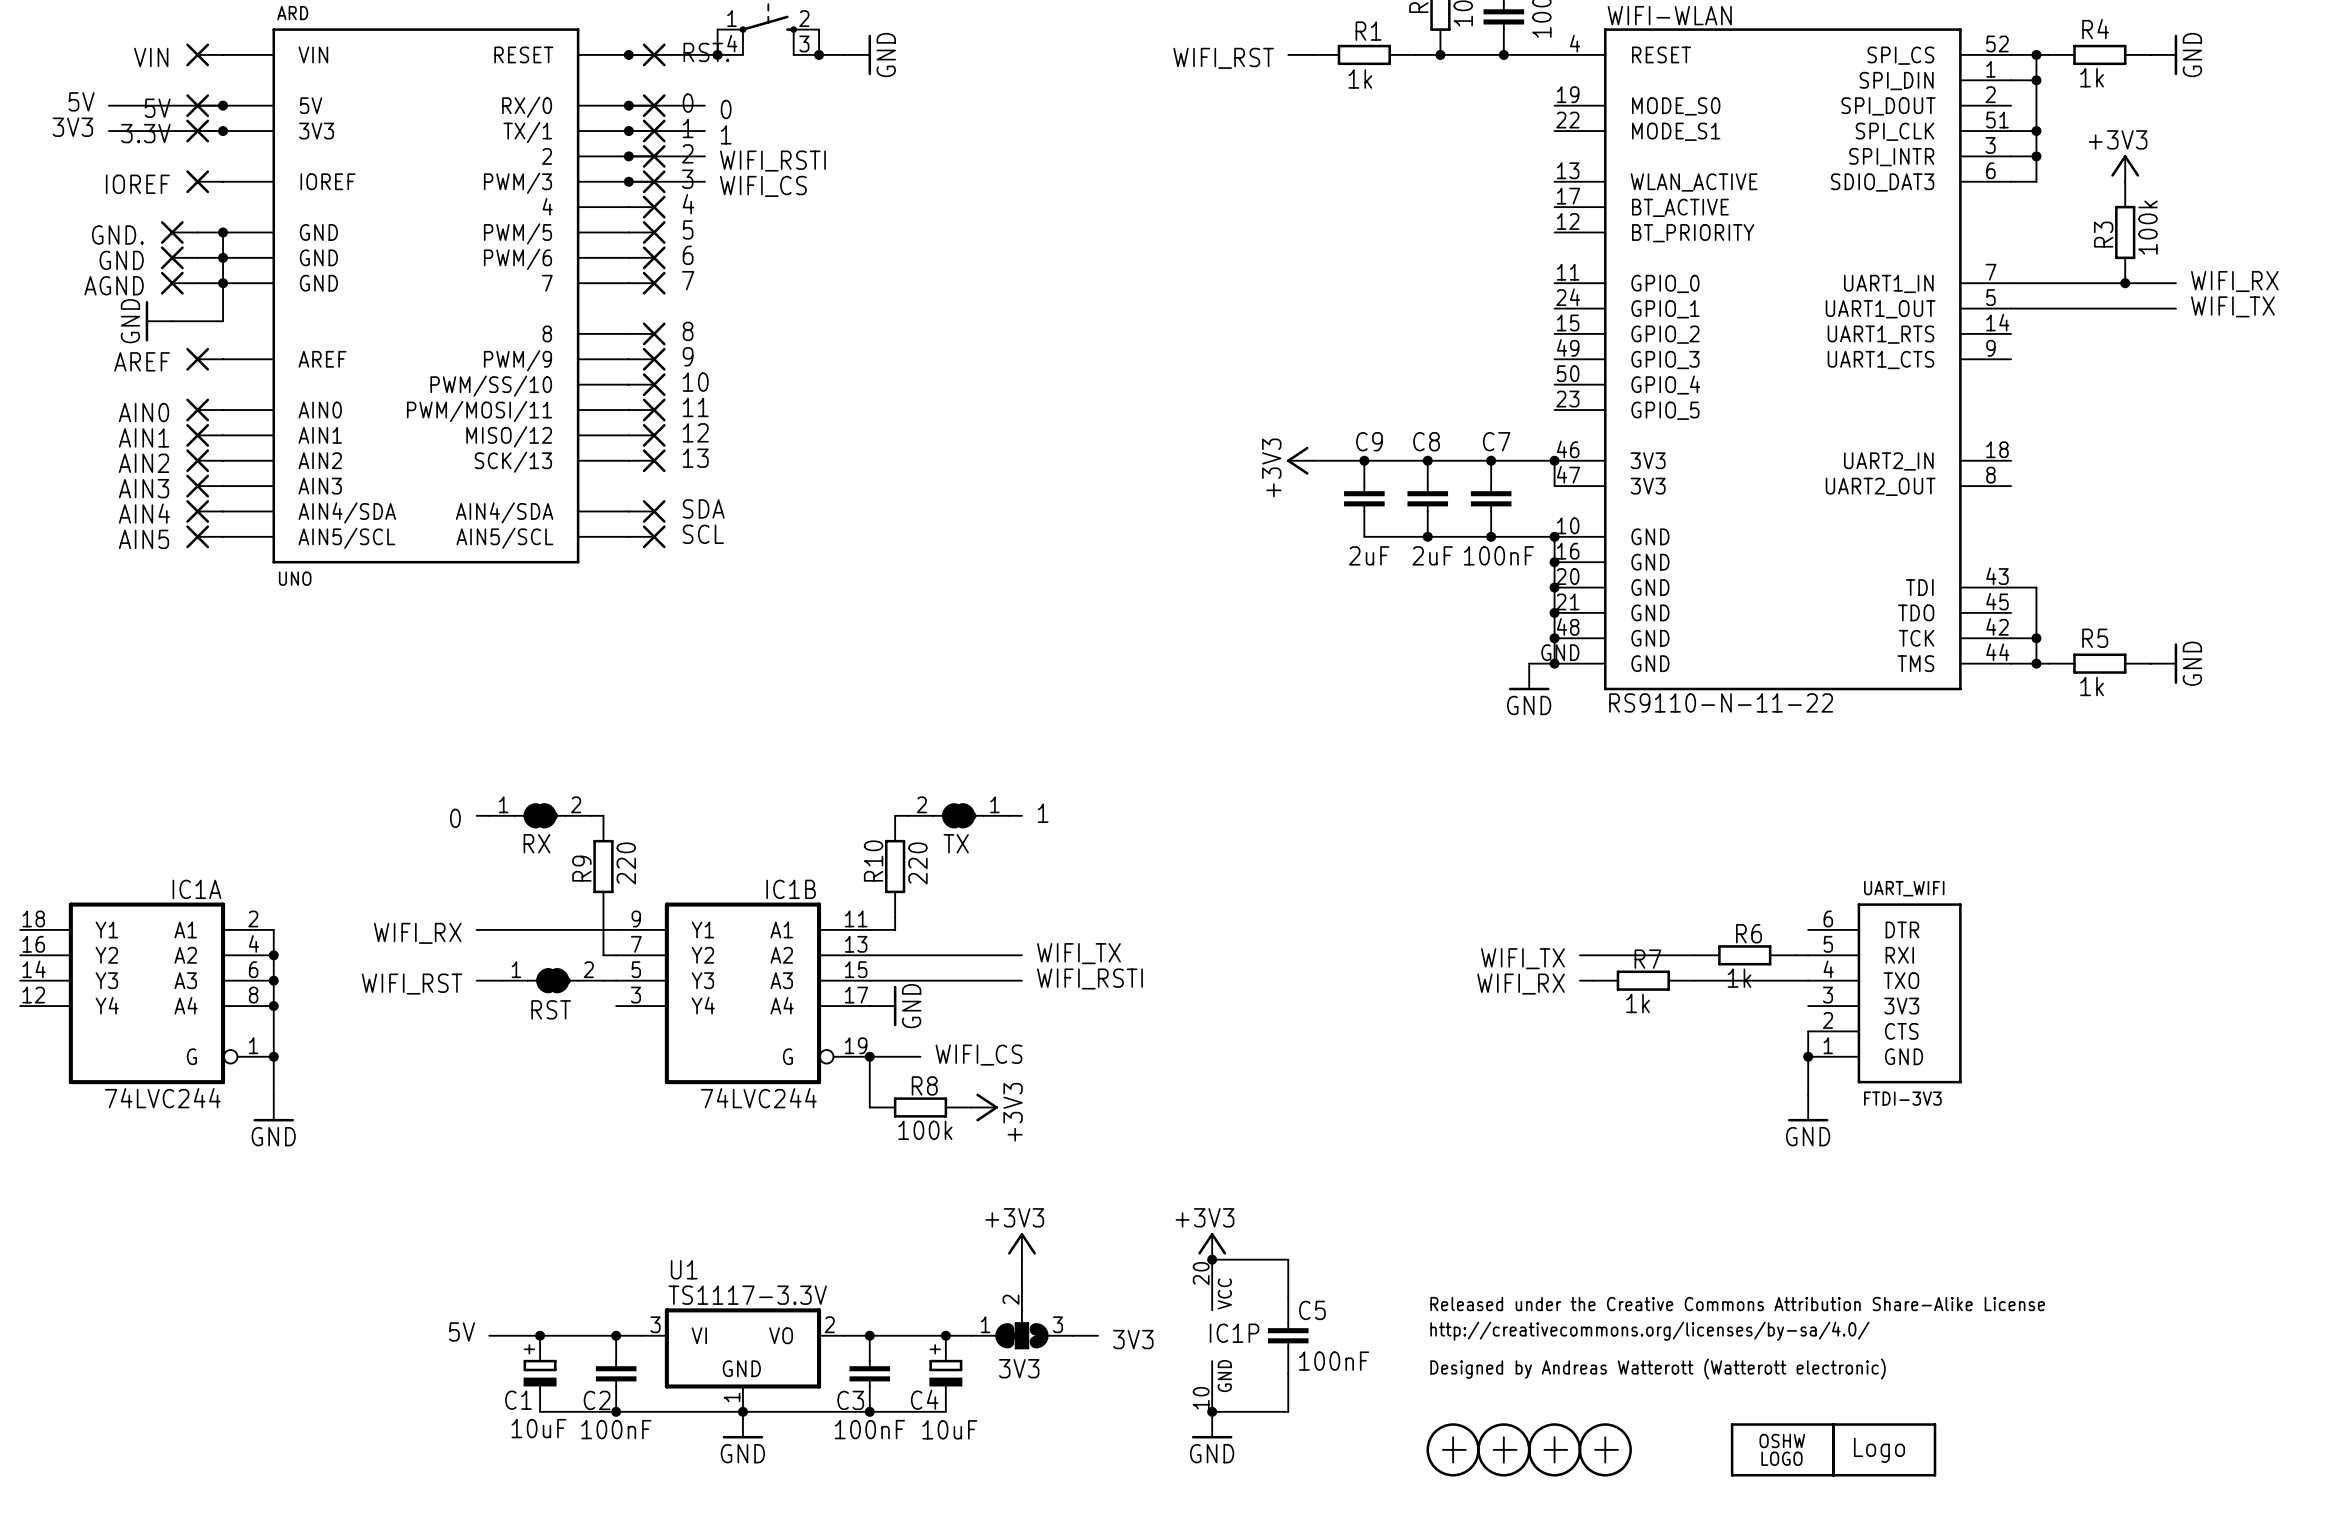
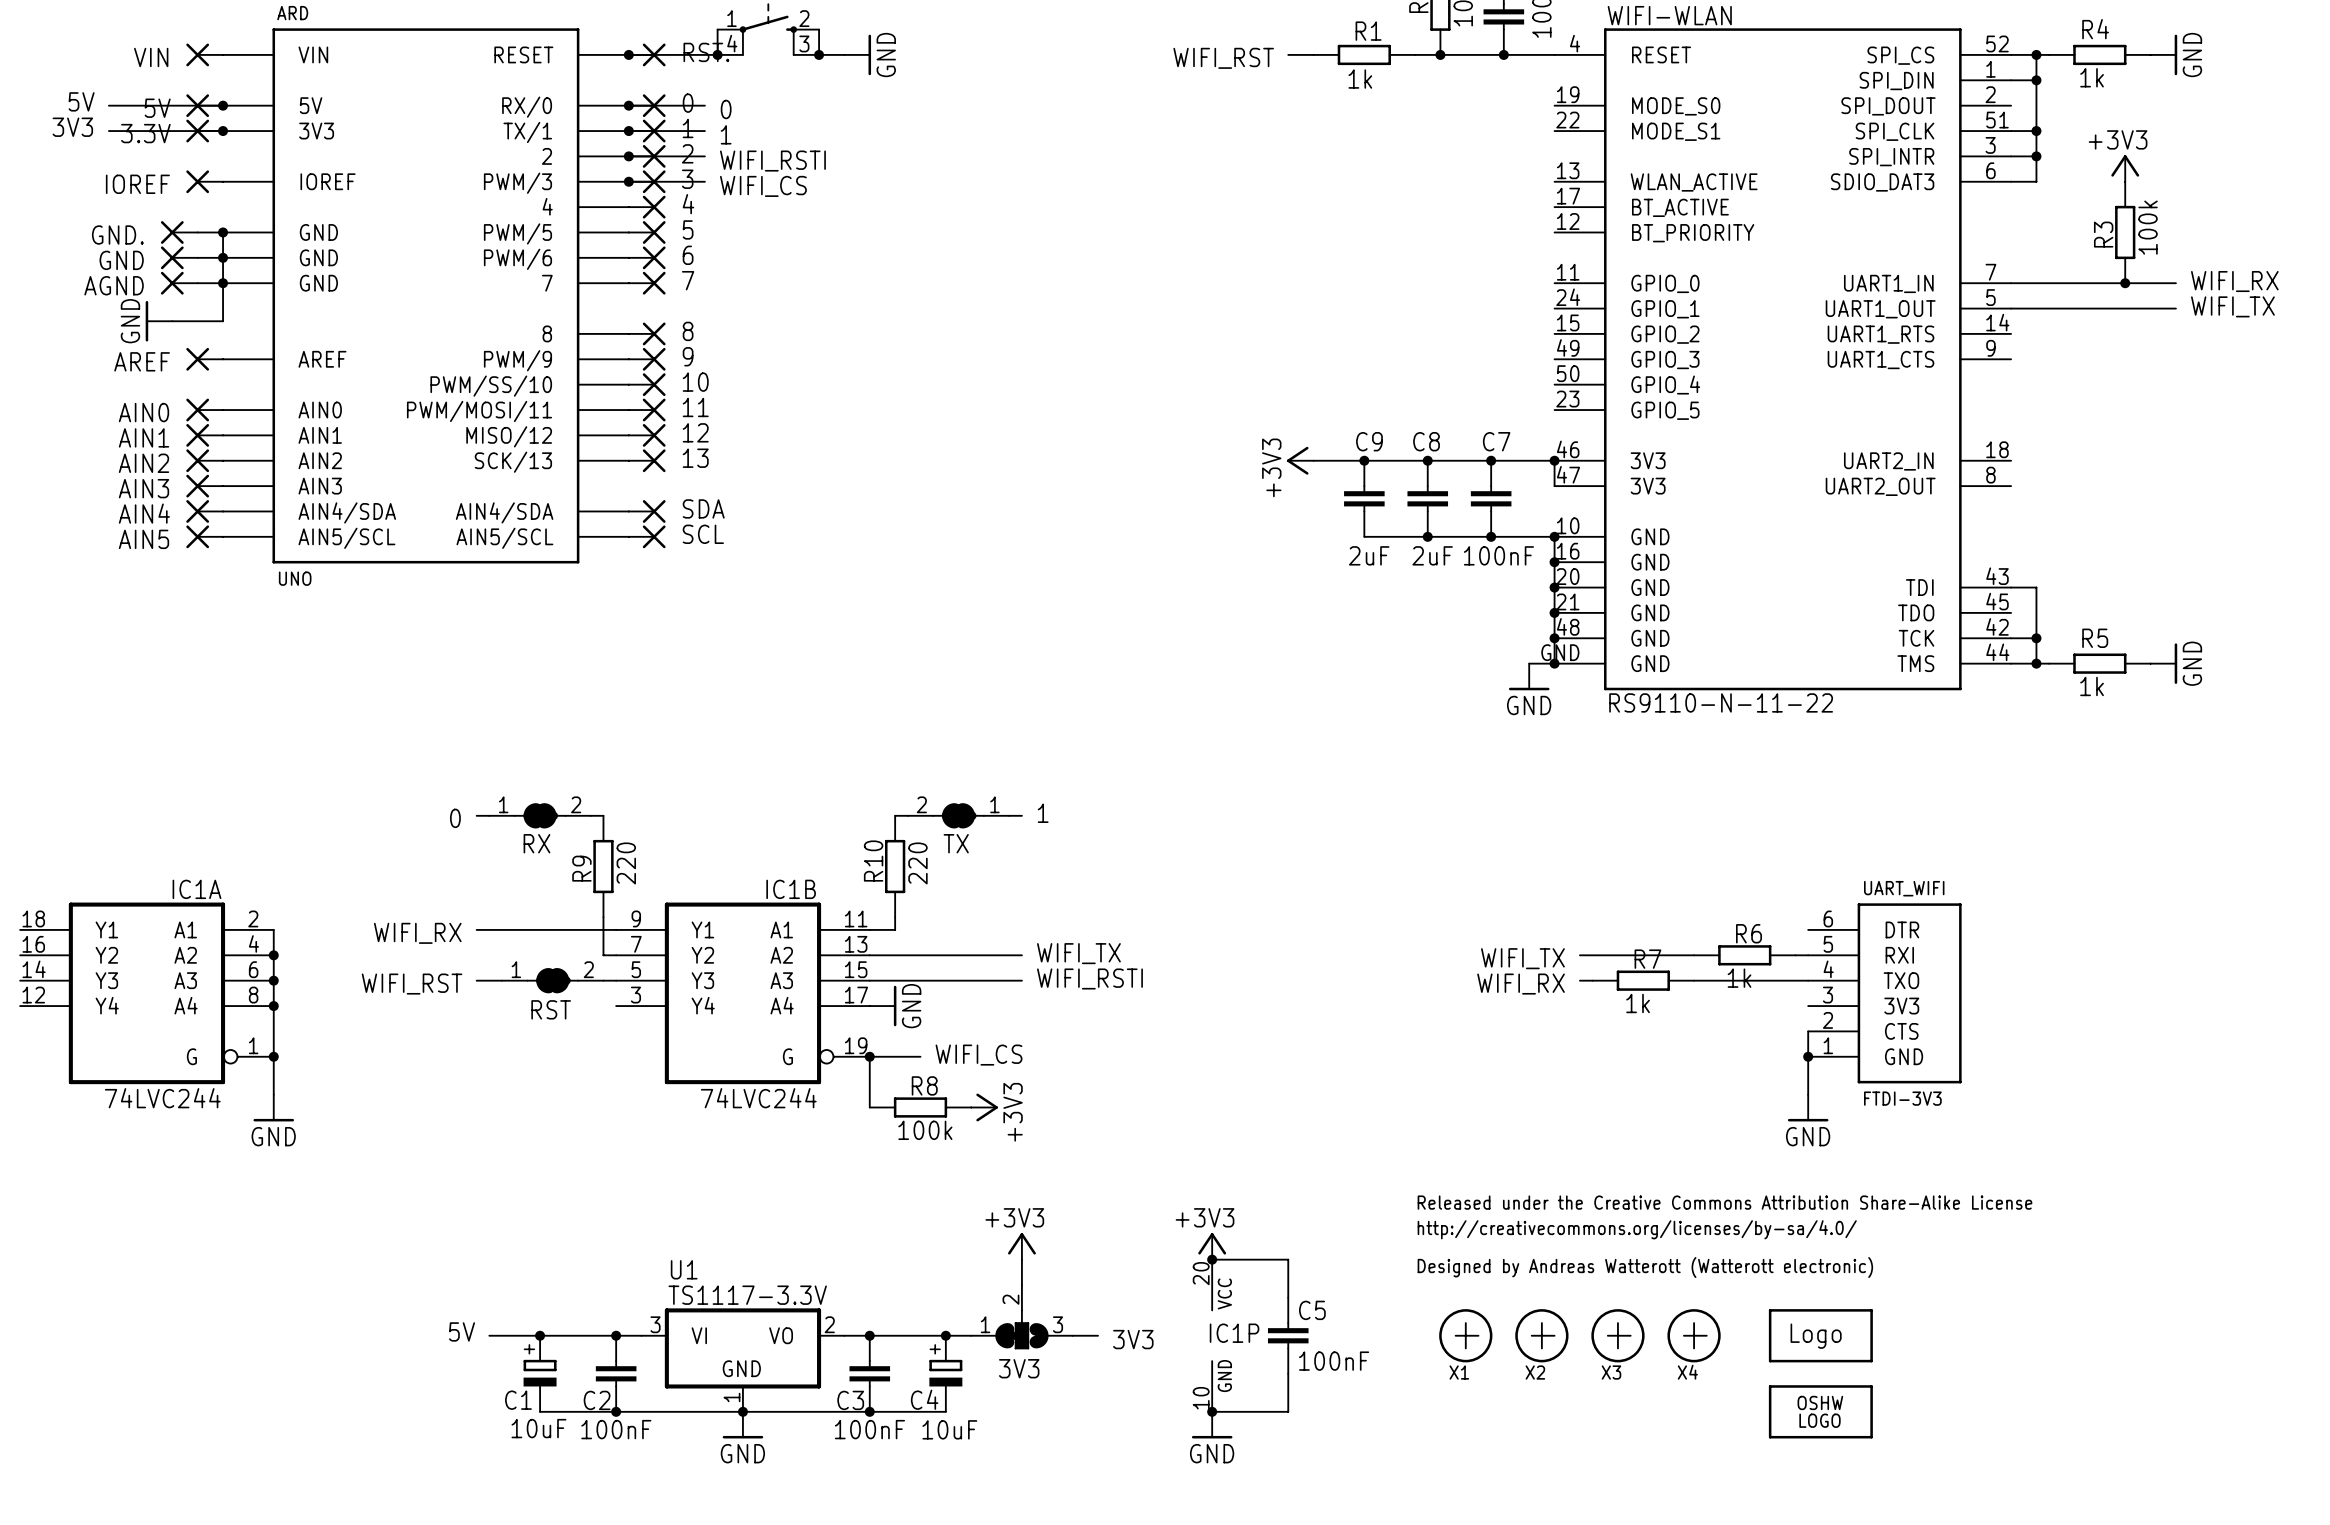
text position: Released under the Creative Commons Attribution Share-Alike License (1737, 1304) -> Released under the Creative Commons Attribution Share-Alike License (1724, 1202)
text position: http://creativecommons.org/licenses/by-sa/4.0/ (1649, 1331) -> http://creativecommons.org/licenses/by-sa/4.0/ (1637, 1229)
X1: none -> (1465, 1335)
X2: none -> (1541, 1335)
X3: none -> (1617, 1335)
X4: none -> (1694, 1335)
text position: Designed by Andreas Watterott (Watterott electronic) (1658, 1368) -> Designed by Andreas Watterott (Watterott electronic) (1645, 1267)
part: (1453, 1449) -> none
part: (1503, 1449) -> none
part: (1554, 1449) -> none
part: (1605, 1449) -> none
part position: (1782, 1449) -> (1820, 1411)
part position: (1884, 1449) -> (1820, 1335)

